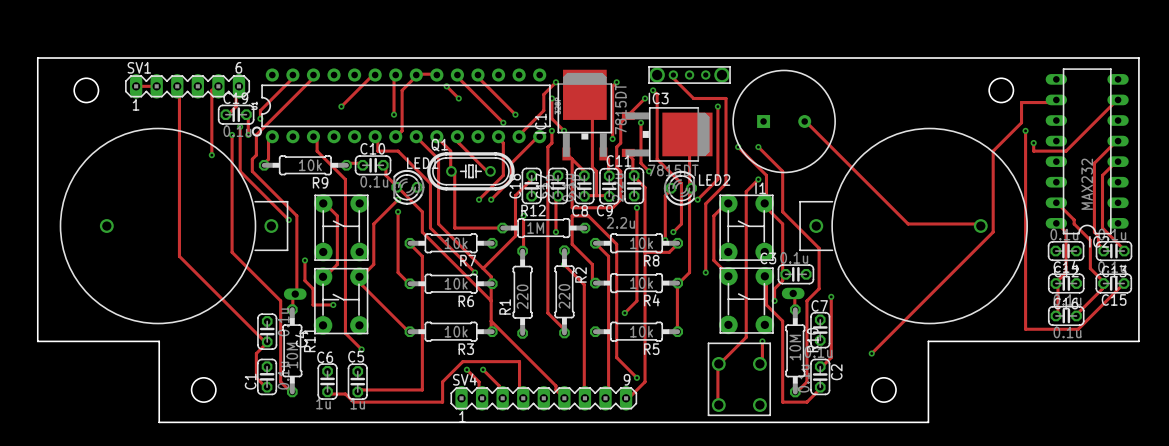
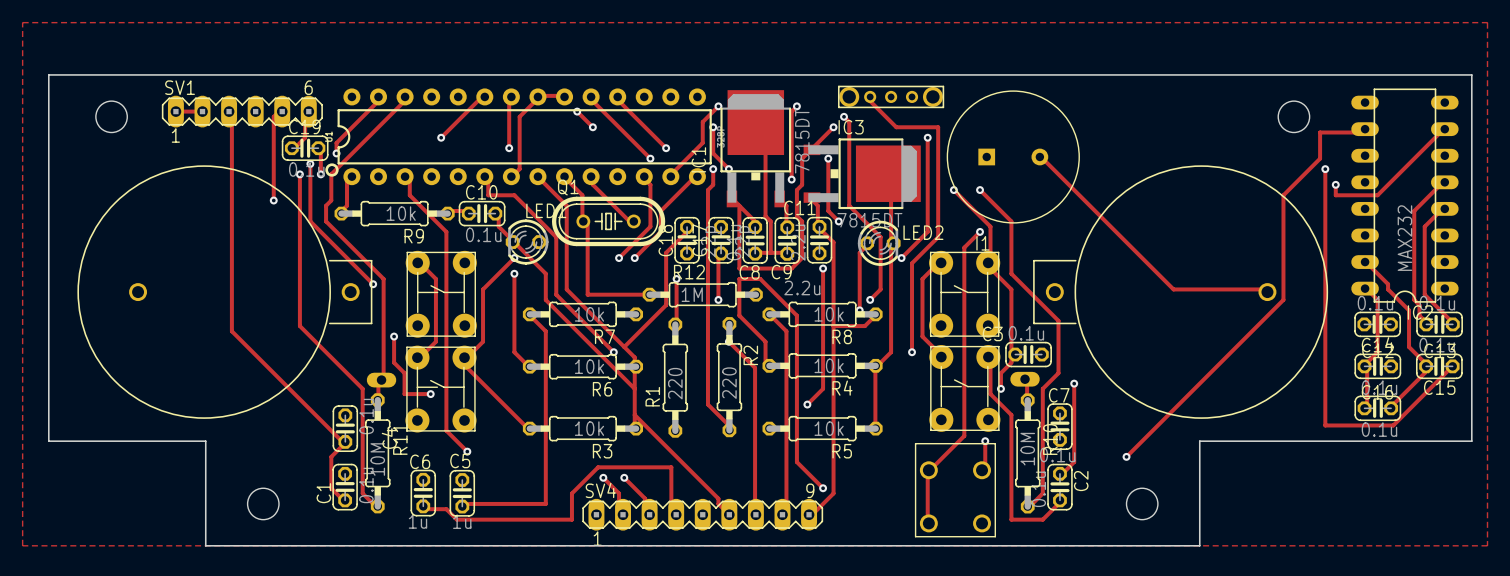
zone outline: none -> (22, 22) (1487, 22) (1487, 545) (22, 545) (22, 22)

